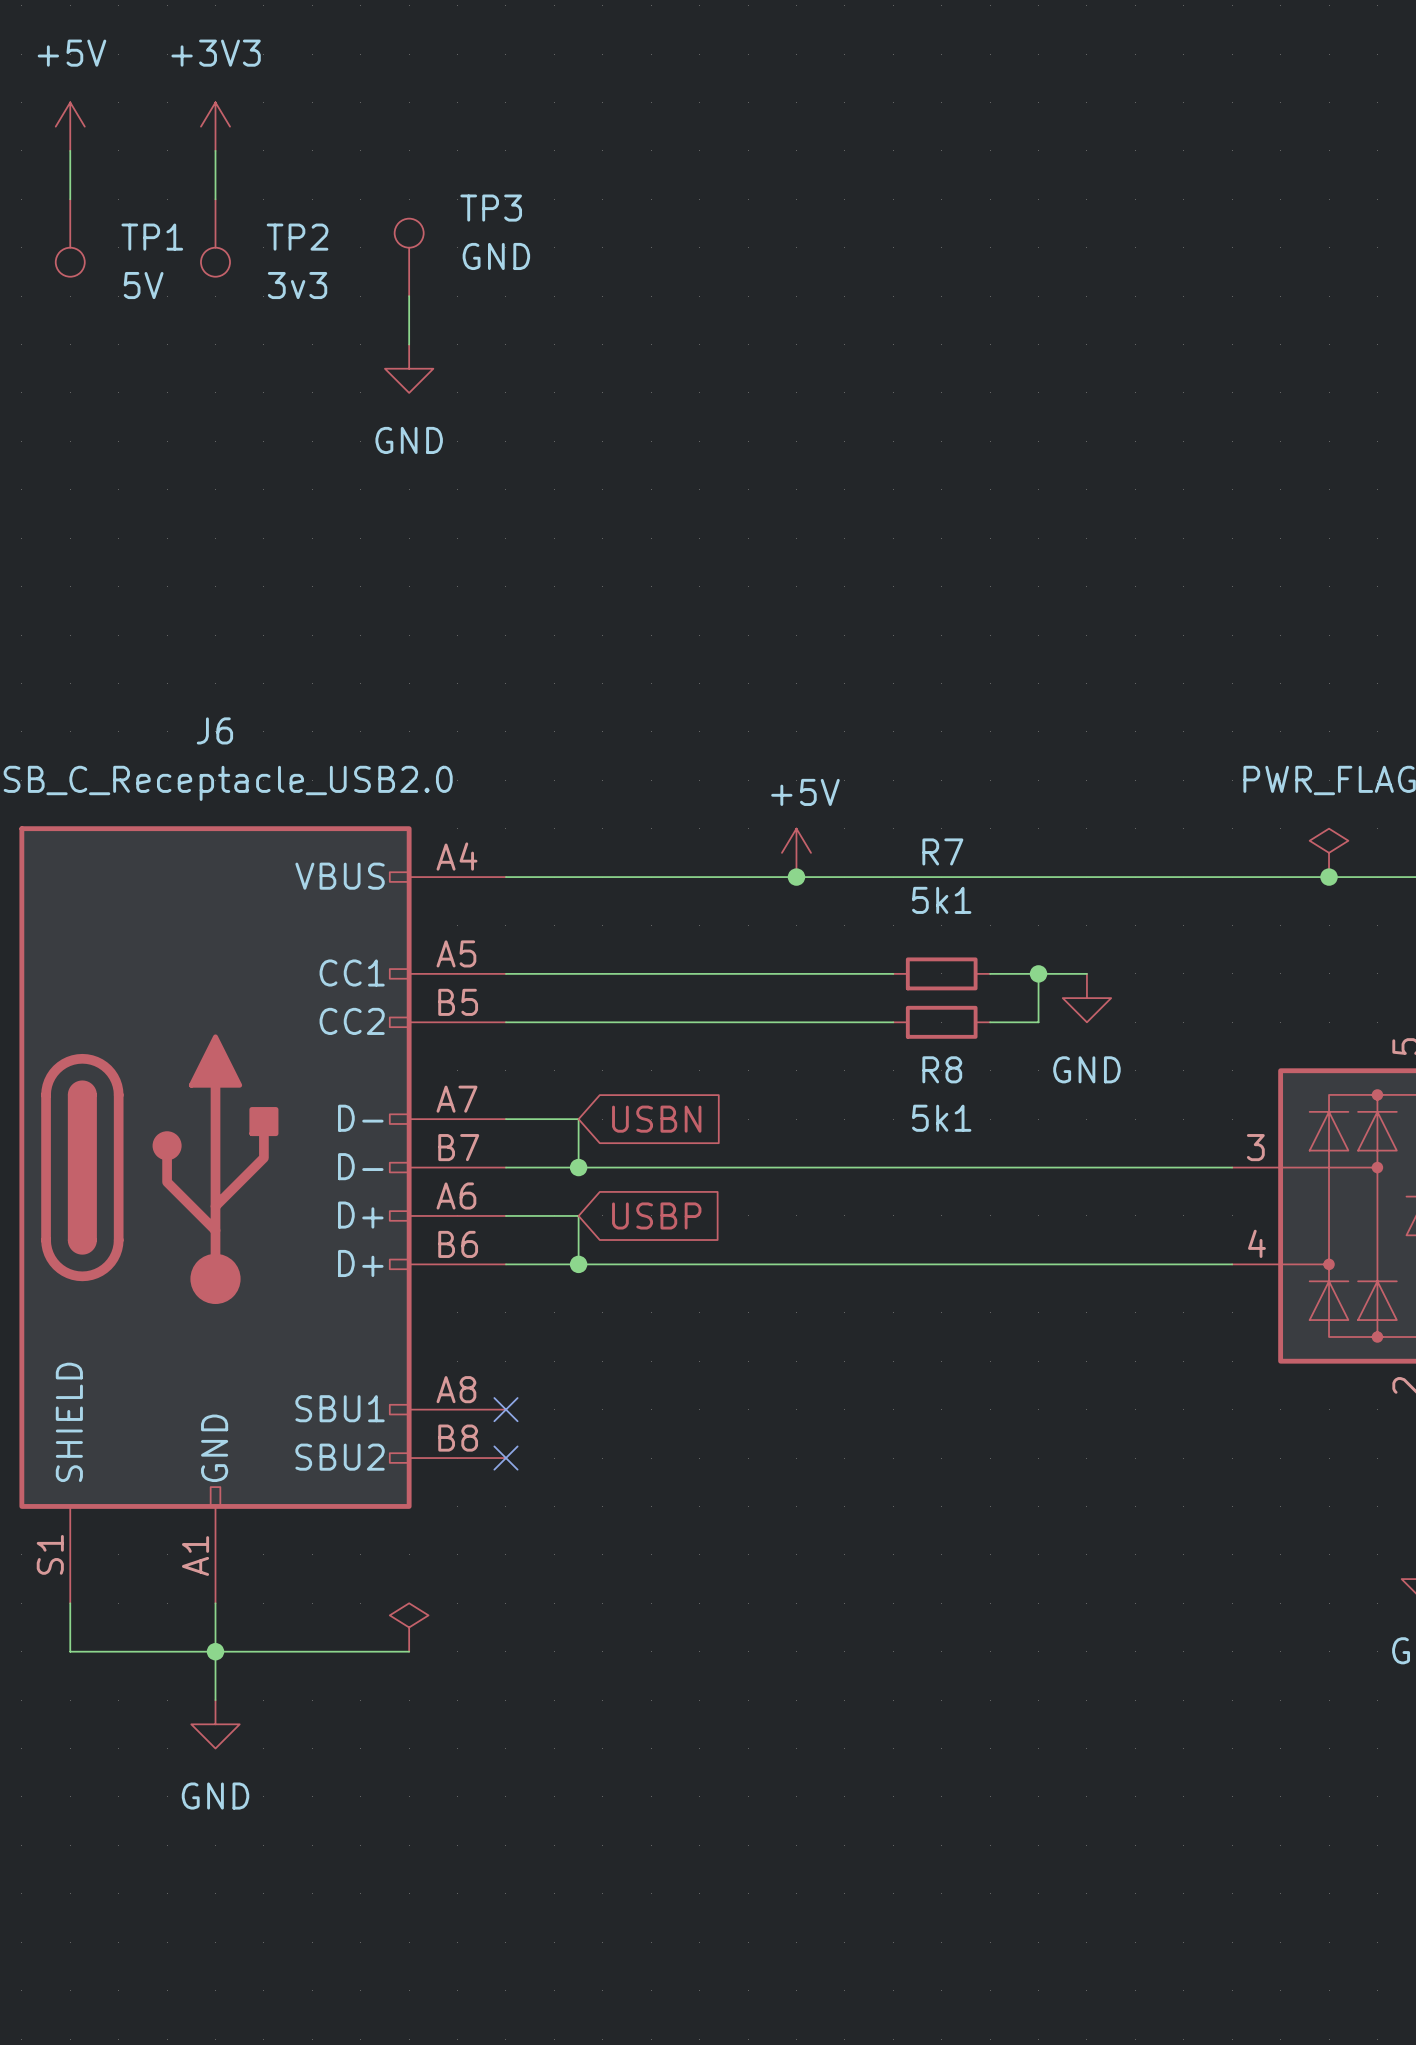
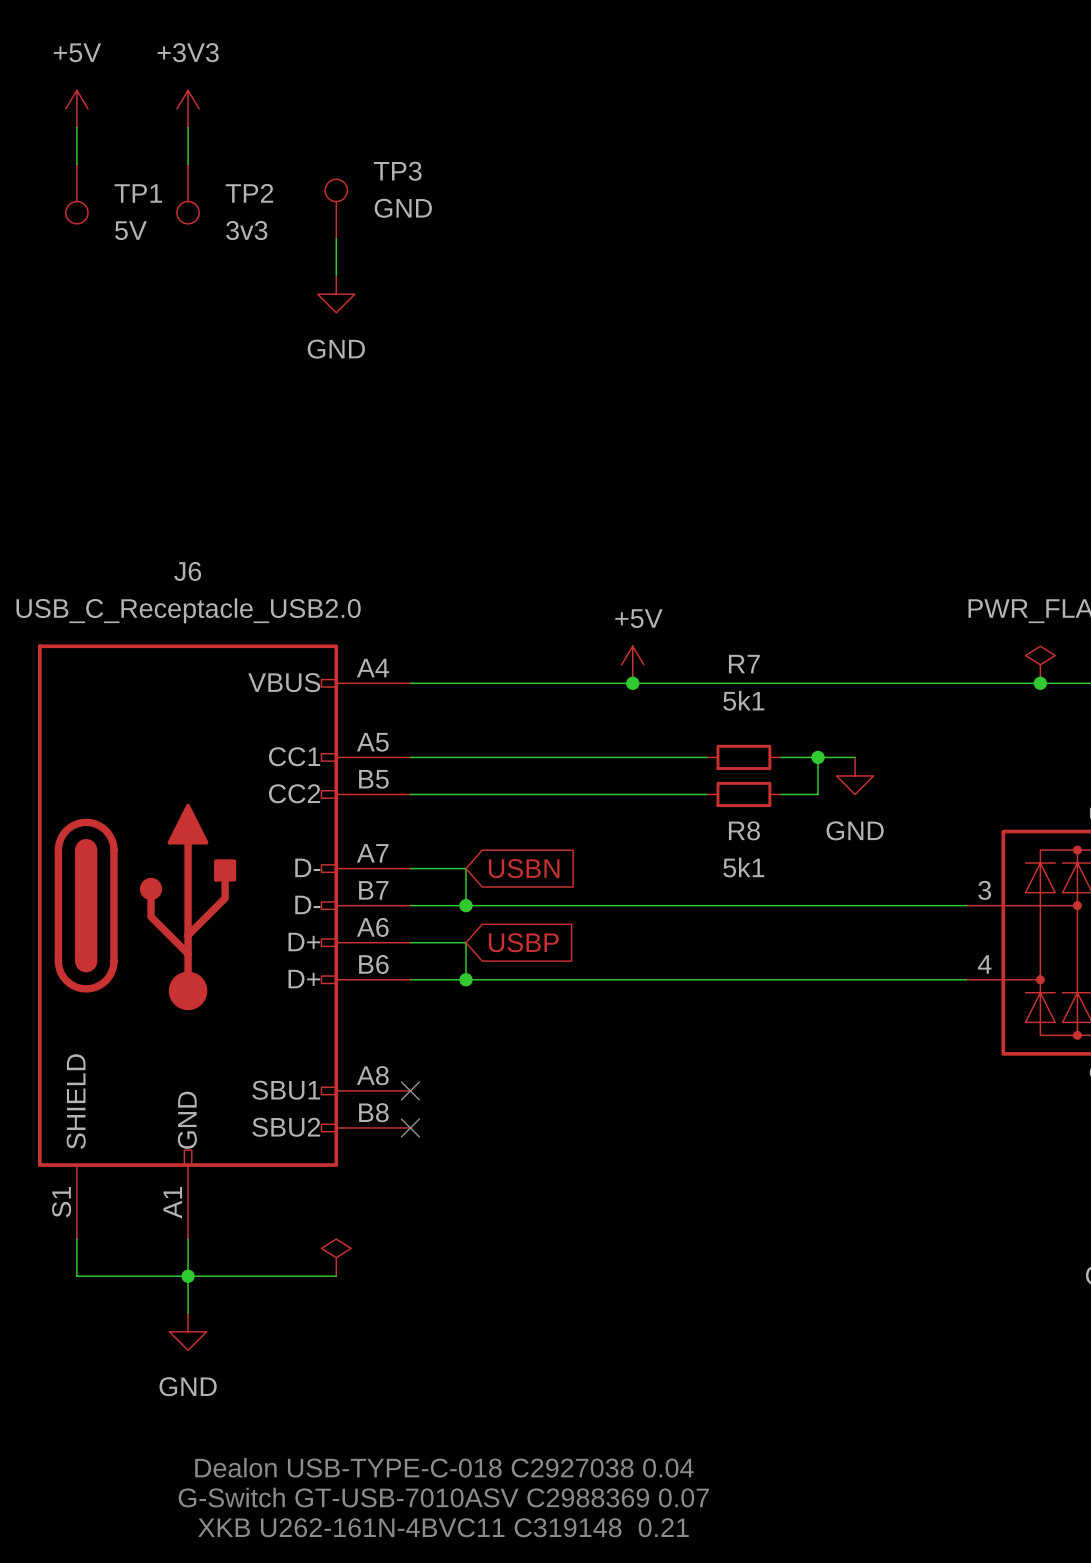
text: none -> Dealon USB-TYPE-C-018 C2927038 0.04 (444, 1467)
text: none -> G-Switch GT-USB-7010ASV C2988369 0.07 (443, 1497)
text: none -> XKB U262-161N-4BVC11 C319148 0.21 (443, 1527)

